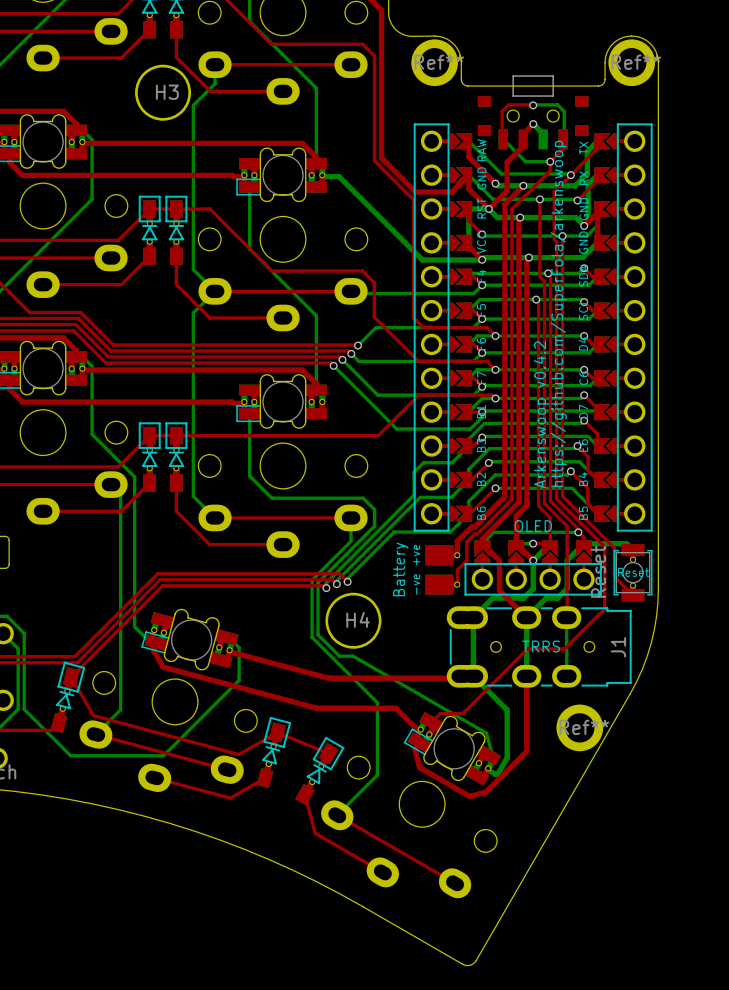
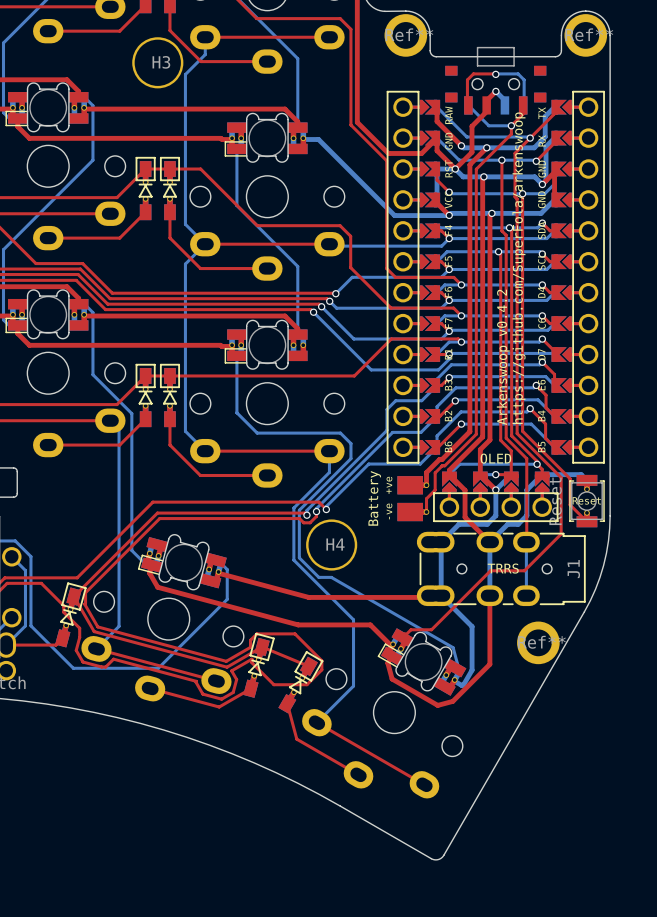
top track: (336, 584) (332, 579) (160, 579) (77, 662) (35, 662) -> (251, 659) (231, 670) (236, 679) (233, 692) (221, 699) (202, 694) (196, 681) (113, 659) (105, 667) (82, 661) (76, 650) (79, 628) (63, 612) (64, 606) (41, 583)
top track: none -> (316, 511) (316, 516) (310, 522) (303, 522) (299, 518) (159, 518) (85, 592) (84, 604) (97, 626) (226, 661) (250, 647) (250, 640) (256, 633) (294, 633) (321, 660) (321, 669) (306, 684) (273, 684) (251, 662) (251, 659)

